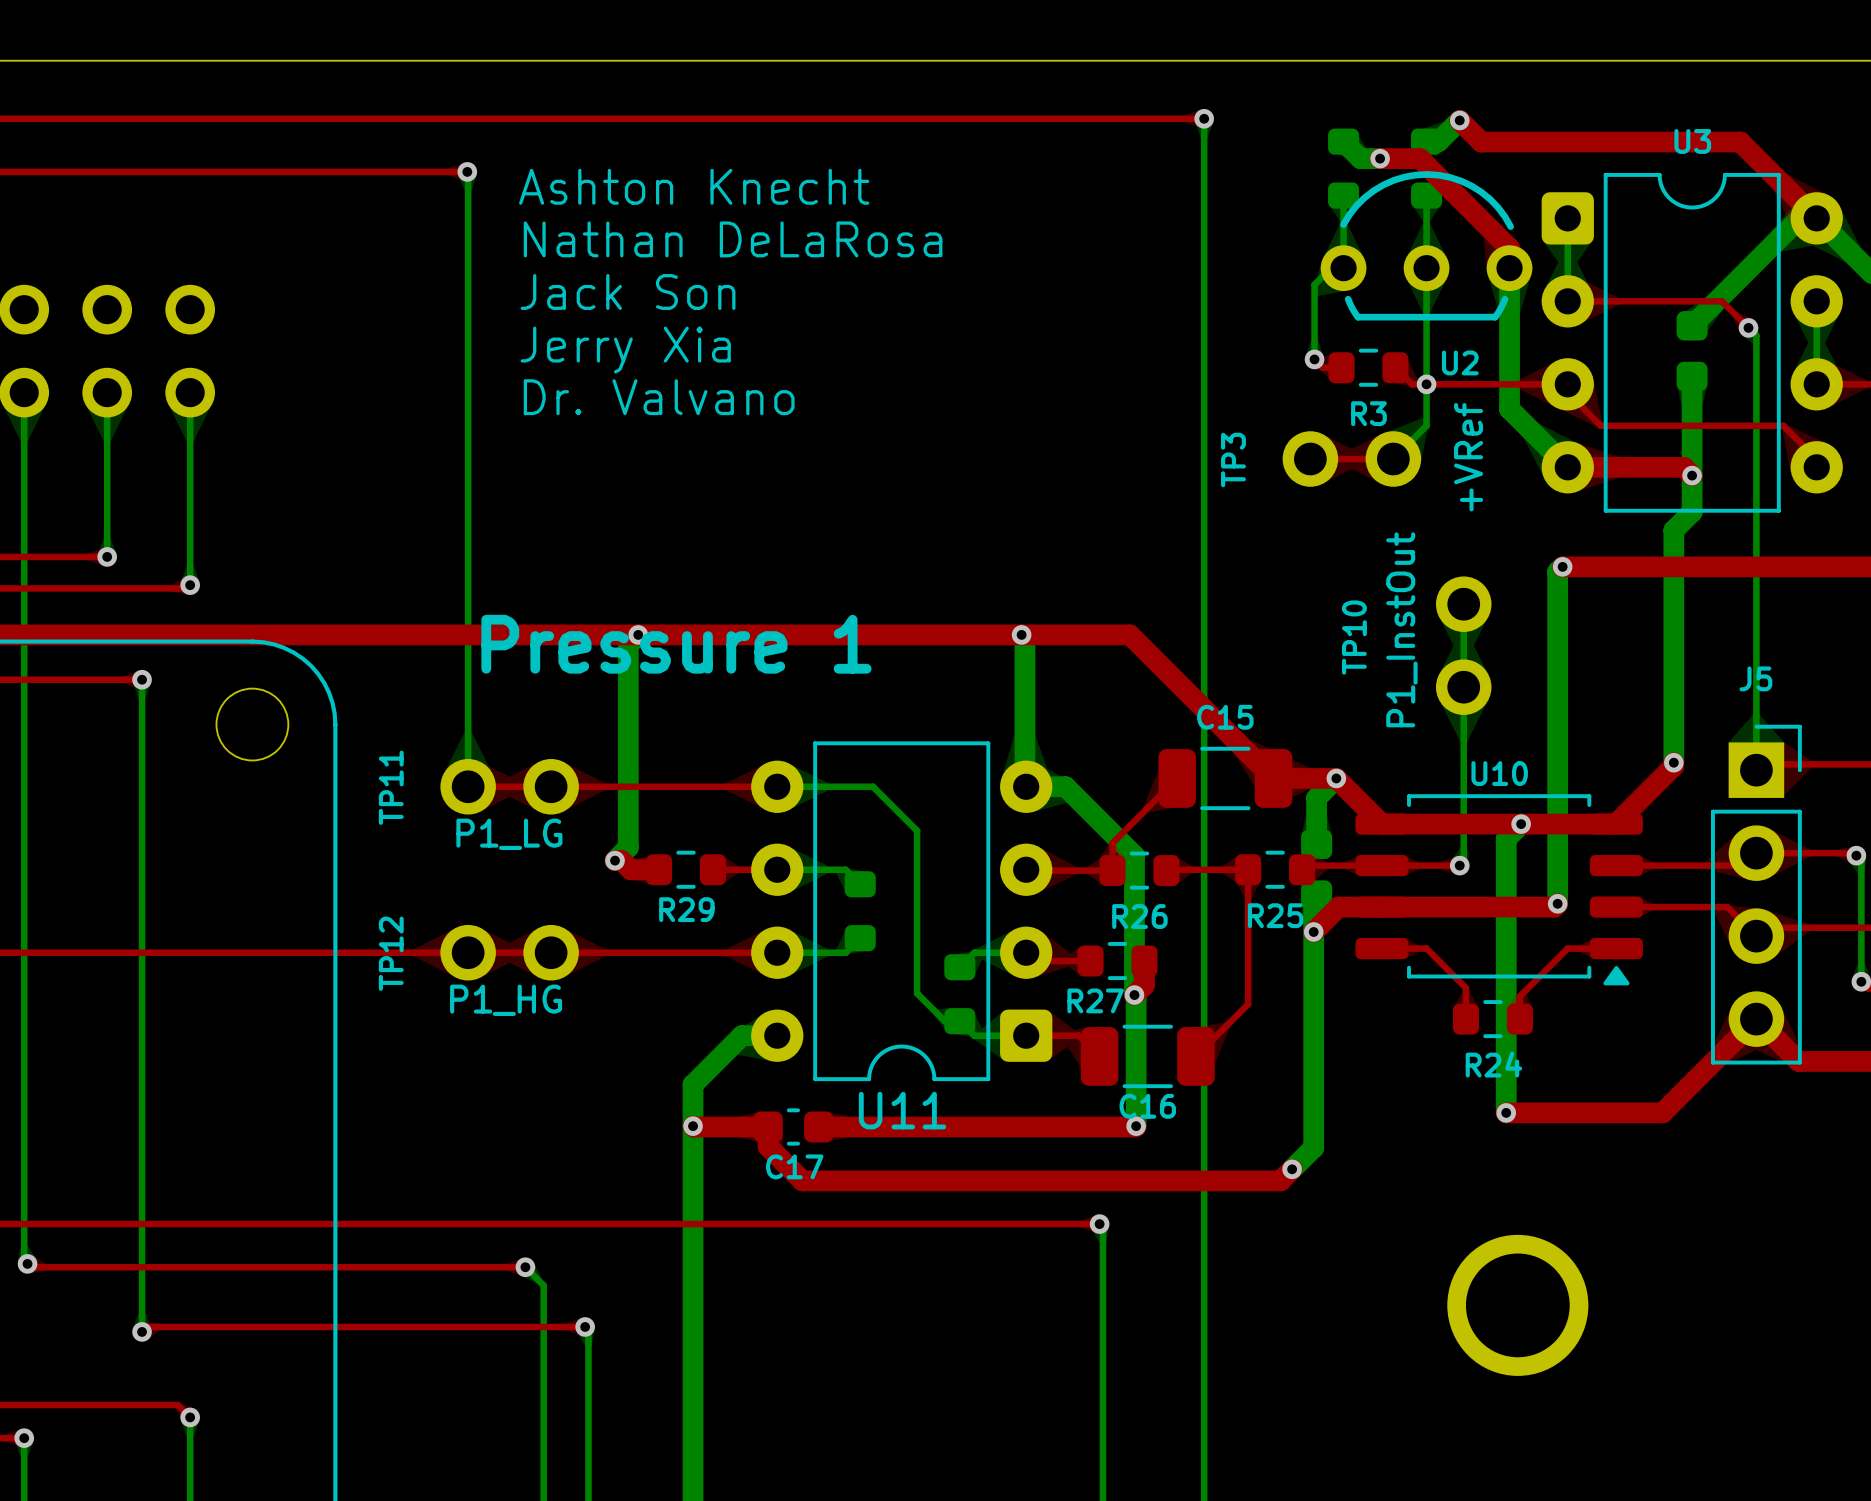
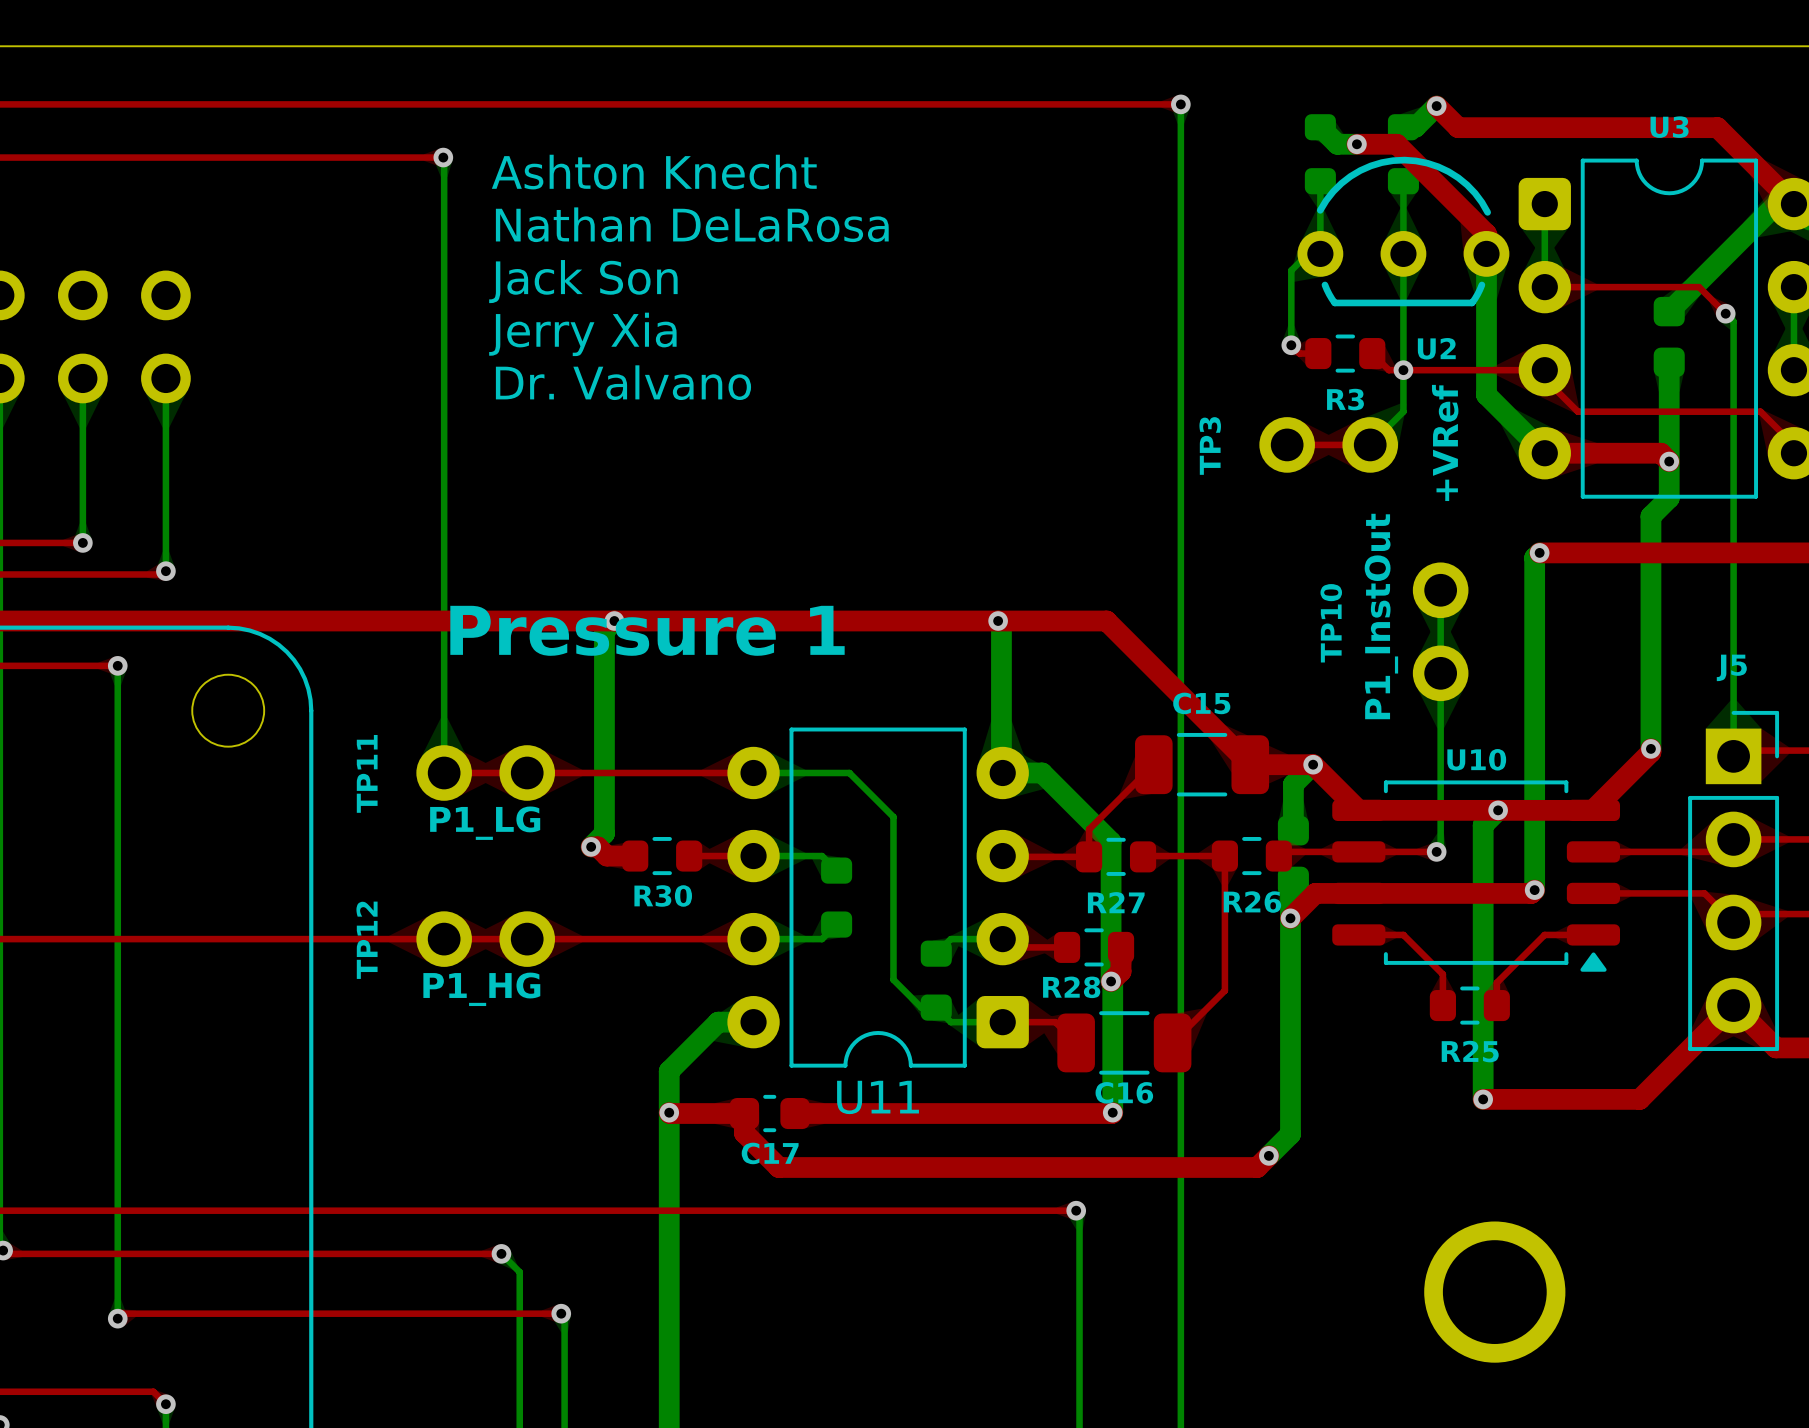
R29 name: R29 (686, 909) -> R30 (663, 895)
R25 name: R25 (1275, 915) -> R26 (1252, 902)
R26 name: R26 (1139, 916) -> R27 (1116, 902)
R27 name: R27 (1095, 1000) -> R28 (1071, 987)
R24 name: R24 (1493, 1064) -> R25 (1470, 1051)

